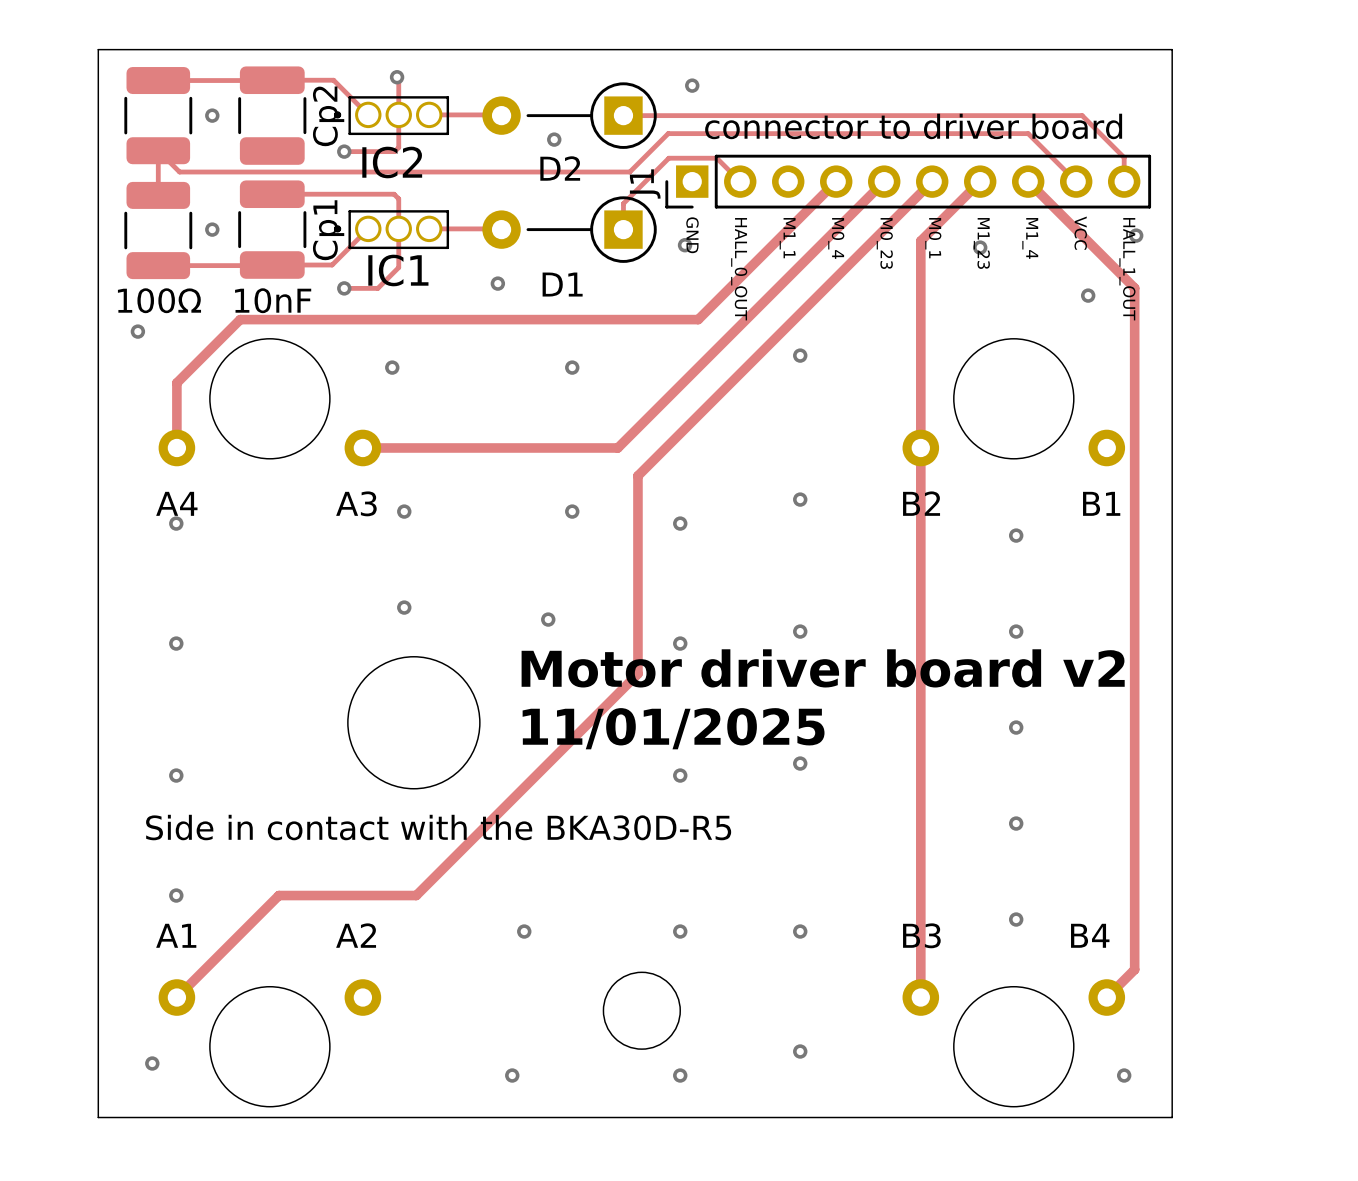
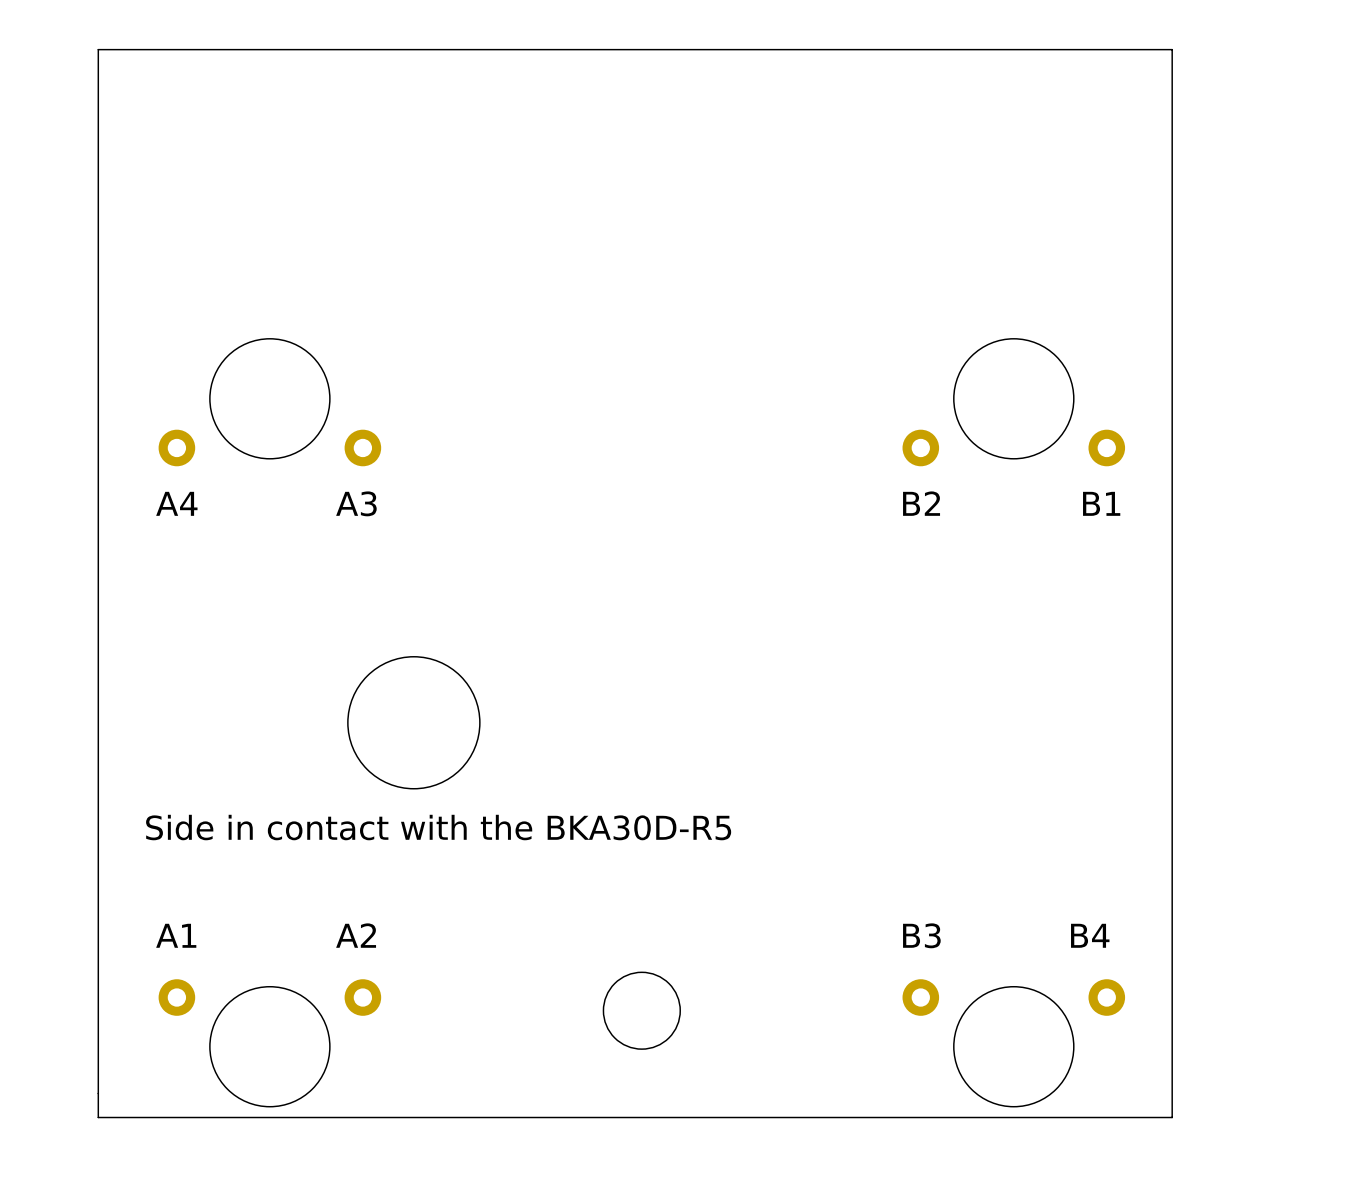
track: (397, 77) (398, 78) (398, 147) (394, 151) (344, 151) -> none
via: (397, 77) -> none
track: (158, 80) (271, 80) -> none
track: (272, 80) (333, 80) (368, 114) -> none
via: (692, 85) -> none
track: (429, 114) (501, 115) -> none
part: (158, 115) -> none
via: (212, 115) -> none
Cp2: (272, 115) -> none
IC2: (391, 115) -> none
D2: (569, 115) -> none
track: (623, 115) (1082, 115) (1124, 157) (1124, 181) -> none
via: (554, 139) -> none
via: (344, 151) -> none
track: (740, 181) (716, 158) (668, 158) (623, 203) (623, 229) -> none
track: (836, 181) (698, 319) (240, 319) (176, 382) (176, 447) -> none
track: (884, 181) (617, 447) (362, 447) -> none
J1: connector to driver board (908, 181) -> none
track: (932, 181) (637, 475) (637, 673) (416, 895) (278, 895) (176, 997) -> none
track: (980, 181) (920, 241) (920, 997) -> none
track: (1028, 181) (1134, 288) (1134, 969) (1106, 997) -> none
track: (1076, 181) (1028, 133) (668, 133) (629, 172) (179, 172) (158, 150) (158, 195) -> none
track: (272, 194) (394, 194) (398, 198) (398, 267) (377, 288) (344, 288) -> none
track: (368, 228) (332, 265) (158, 265) -> none
track: (429, 228) (501, 229) -> none
via: (212, 229) -> none
Cp1: 10nF (272, 229) -> none
IC1: (391, 229) -> none
D1: (569, 229) -> none
part: 100Ω (158, 230) -> none
text: VCC (1080, 233) -> none
text: GND (692, 235) -> none
via: (1136, 235) -> none
text: M1_1 (787, 238) -> none
text: M0_4 (836, 238) -> none
text: M0_1 (933, 238) -> none
text: M1_4 (1030, 238) -> none
text: M0_23 (884, 243) -> none
text: M1_23 (981, 243) -> none
via: (685, 245) -> none
via: (980, 247) -> none
text: HALL_0_OUT (739, 269) -> none
text: HALL_1_OUT (1127, 269) -> none
via: (497, 283) -> none
via: (344, 288) -> none
via: (1088, 295) -> none
via: (137, 331) -> none
via: (800, 355) -> none
via: (392, 367) -> none
via: (572, 367) -> none
via: (800, 499) -> none
via: (404, 511) -> none
via: (572, 511) -> none
via: (176, 523) -> none
via: (680, 523) -> none
via: (1016, 535) -> none
via: (404, 607) -> none
via: (548, 619) -> none
via: (800, 631) -> none
via: (1016, 631) -> none
via: (176, 643) -> none
via: (680, 643) -> none
text: Motor driver board v2 (823, 668) -> none
via: (1016, 727) -> none
text: 11/01/2025 (673, 728) -> none
via: (800, 763) -> none
via: (176, 775) -> none
via: (680, 775) -> none
via: (1016, 823) -> none
via: (176, 895) -> none
via: (1016, 919) -> none
via: (524, 931) -> none
via: (680, 931) -> none
via: (800, 931) -> none
via: (800, 1051) -> none
via: (152, 1063) -> none
via: (512, 1075) -> none
via: (680, 1075) -> none
via: (1124, 1075) -> none

